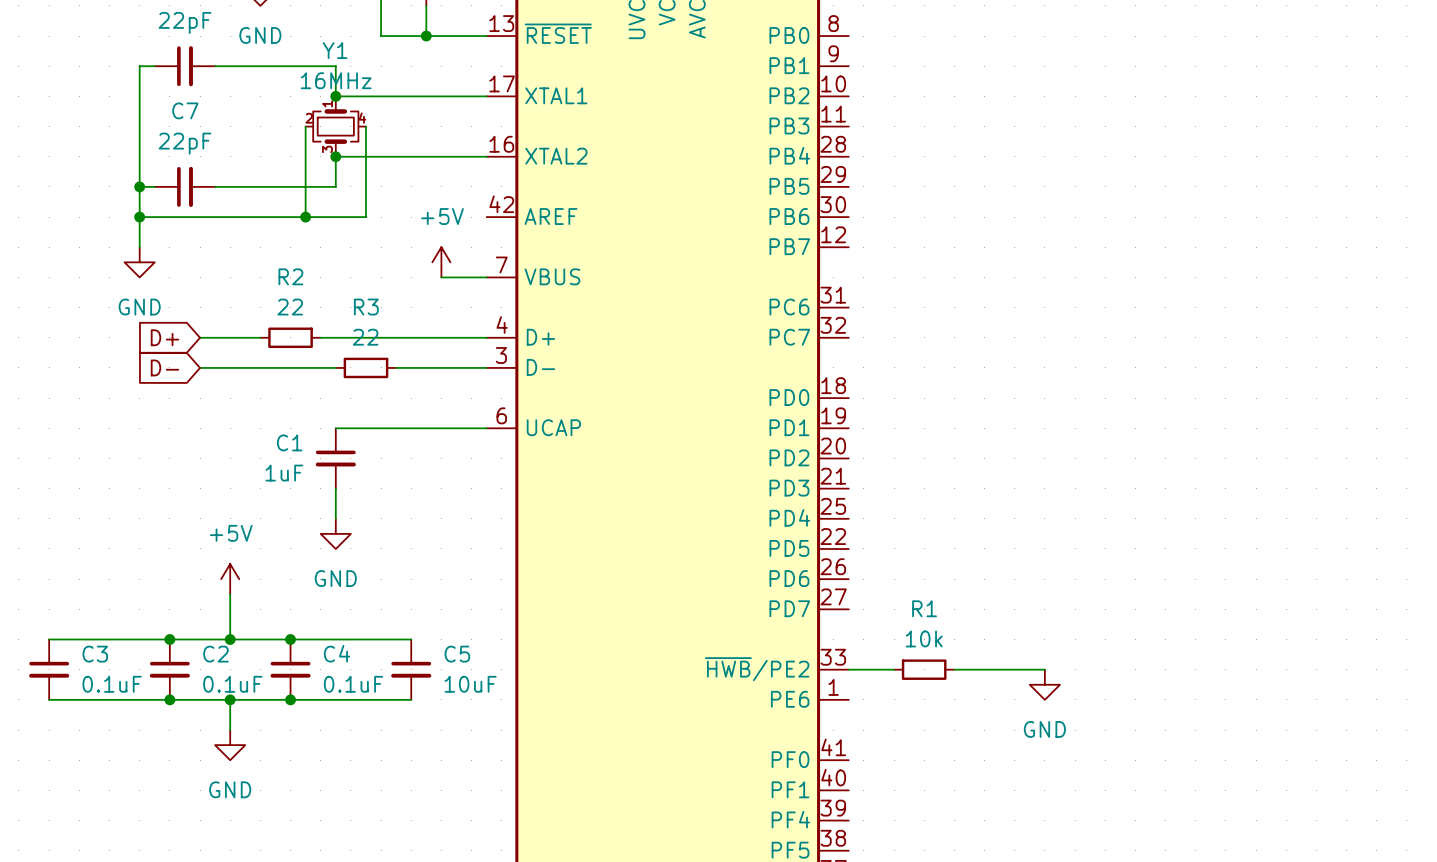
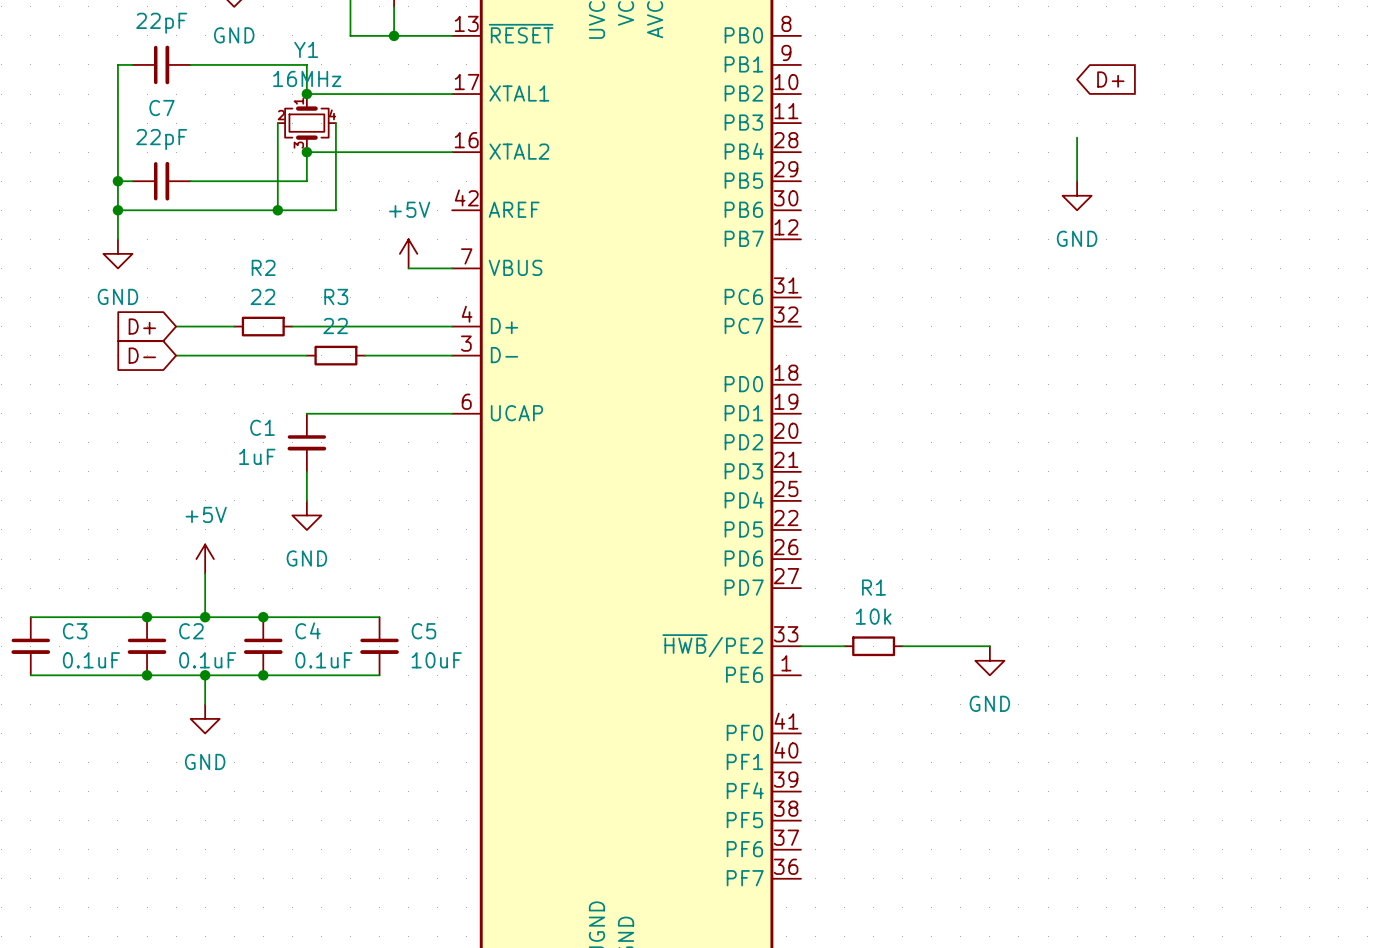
global label: none -> D+ (1110, 79)
wire: none -> (1077, 137) (1077, 181)
power symbol: none -> GND (1077, 195)

